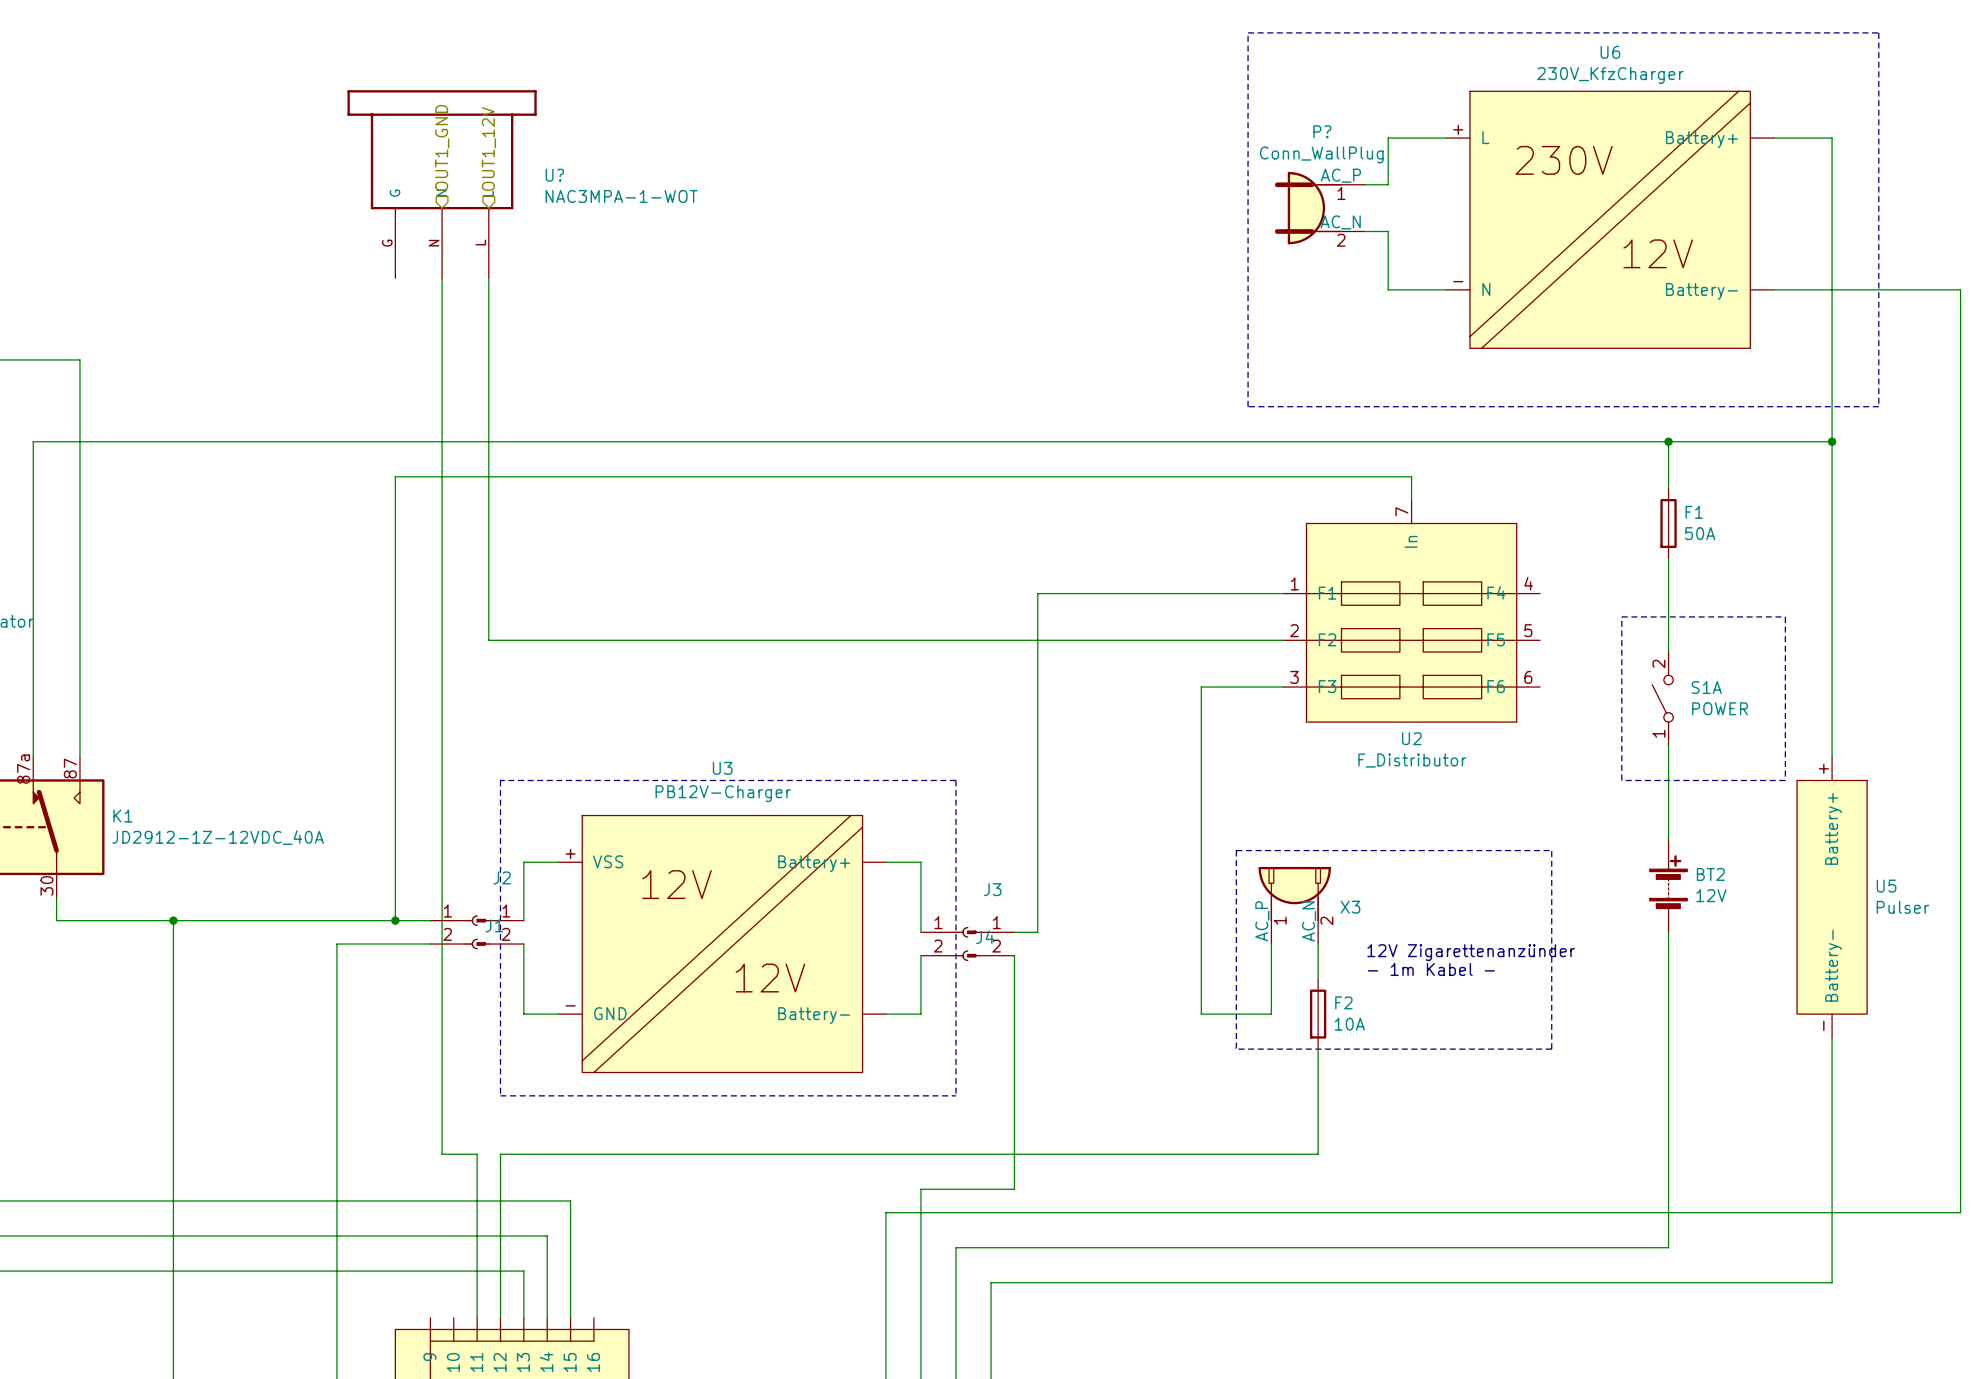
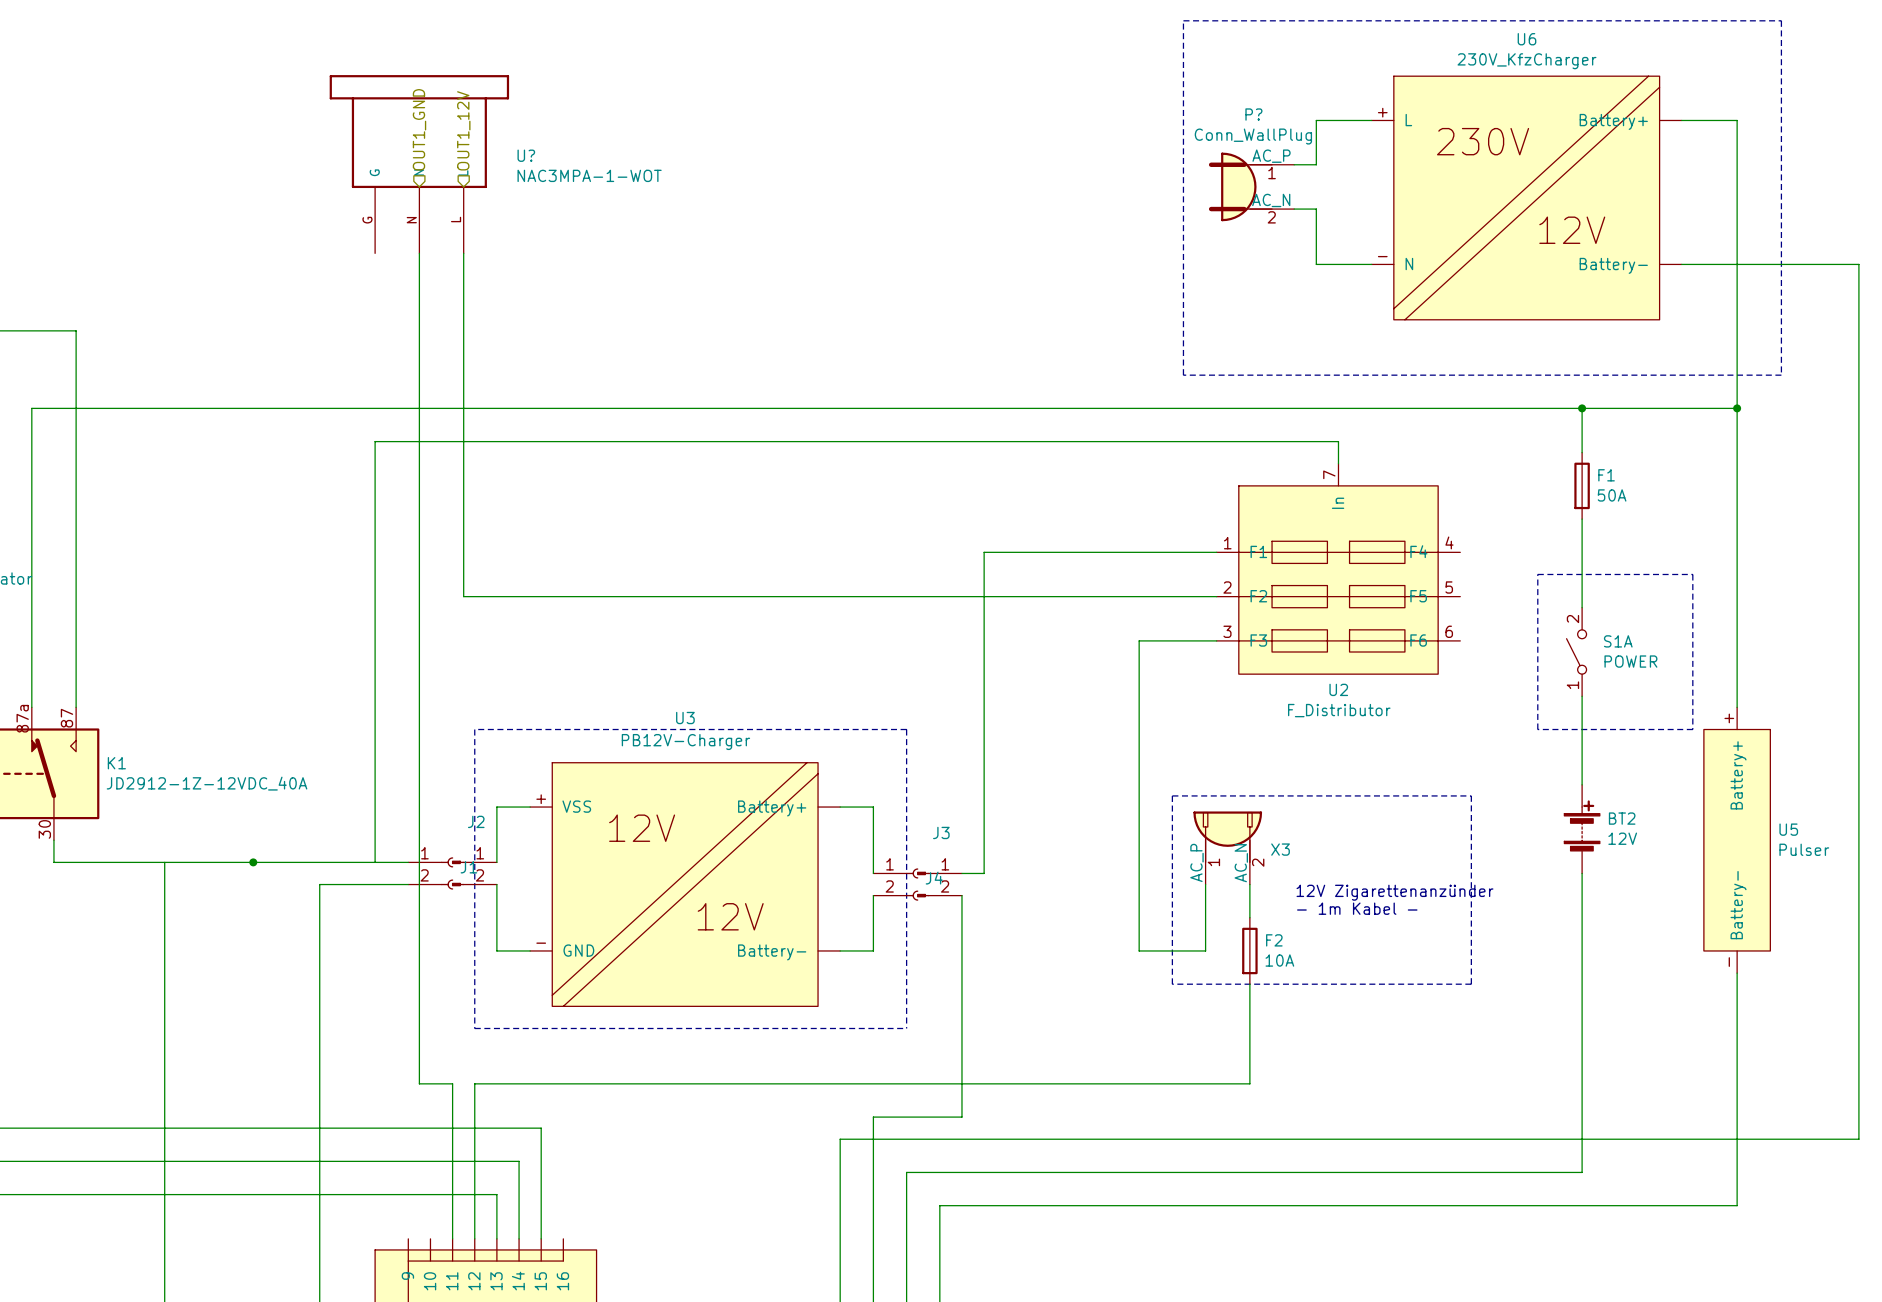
junction: (173, 920) -> none
junction: none -> (253, 862)
junction: (395, 920) -> none

